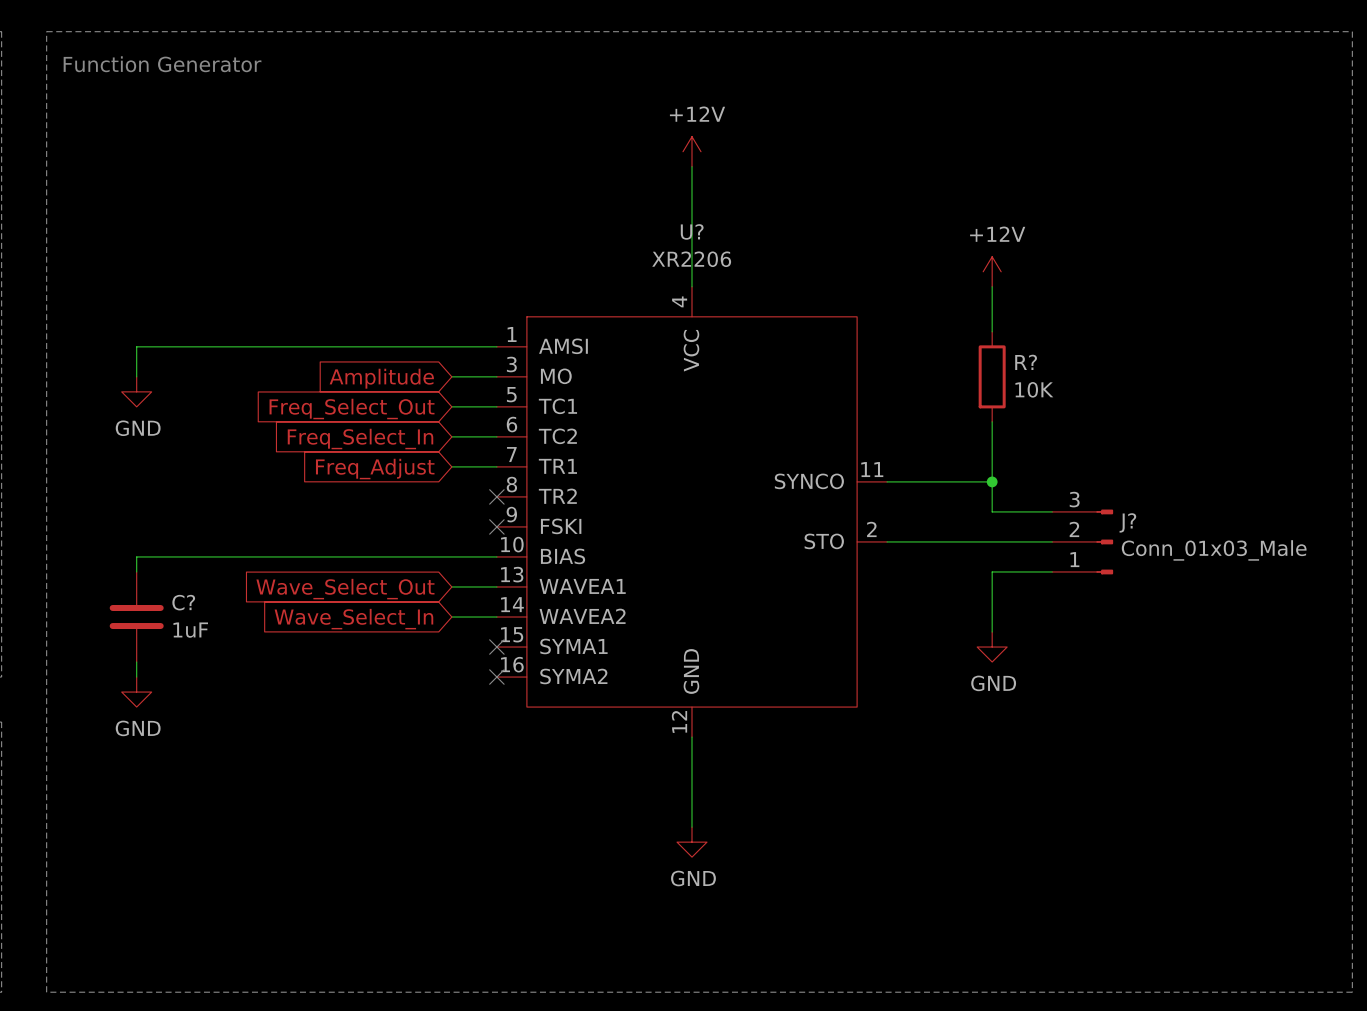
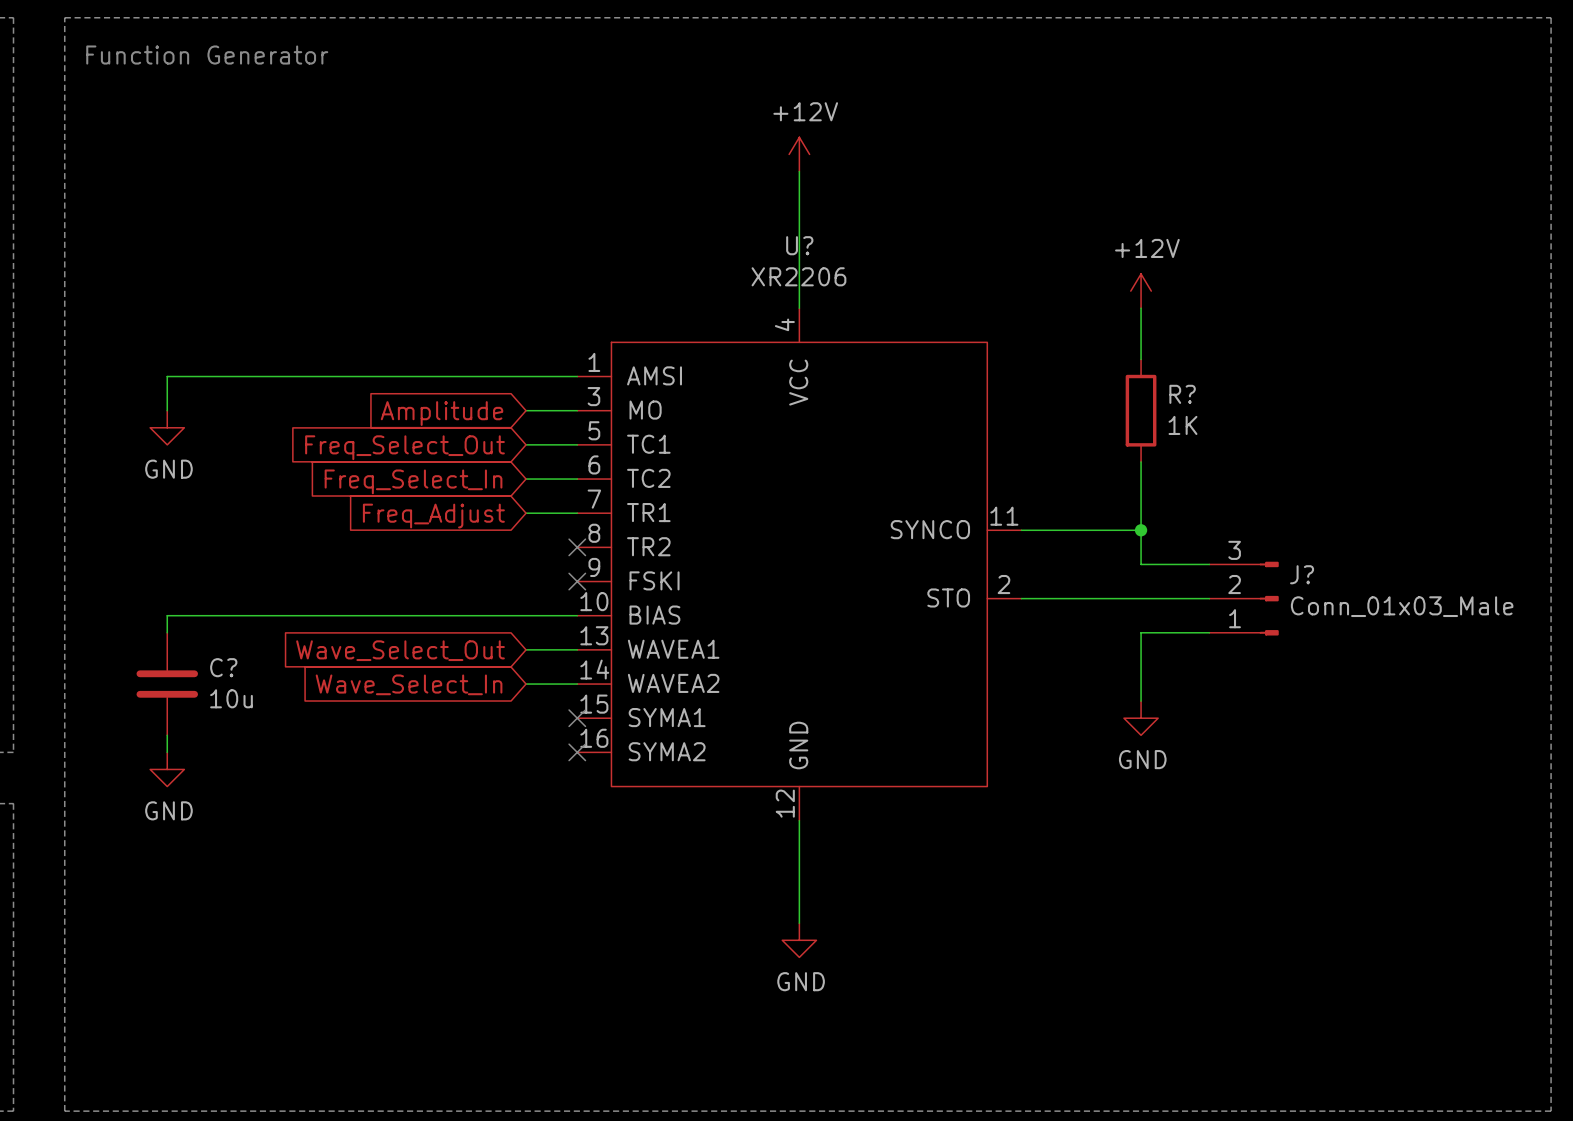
R? value: 10K (1034, 389) -> 1K (1182, 425)
C? value: 1uF (190, 630) -> 10u (231, 698)

